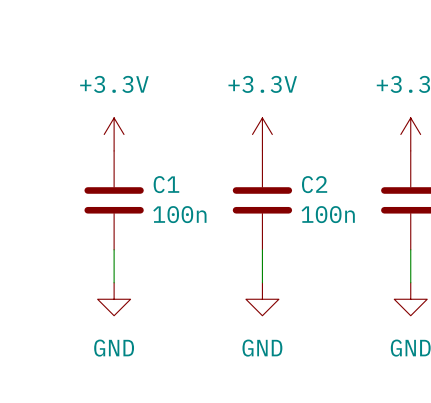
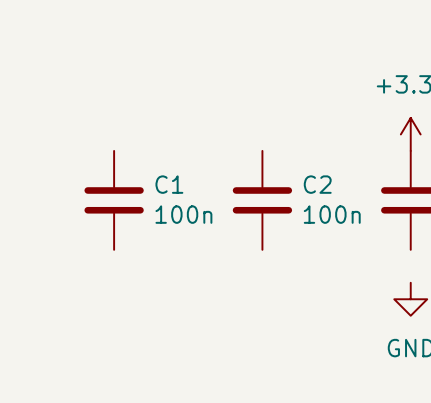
power symbol: +3.3V (114, 134) -> none
power symbol: +3.3V (262, 134) -> none
wire: (114, 249) (114, 282) -> none
wire: (262, 249) (262, 282) -> none
wire: (410, 249) (410, 282) -> none
power symbol: GND (114, 299) -> none
power symbol: GND (262, 299) -> none

